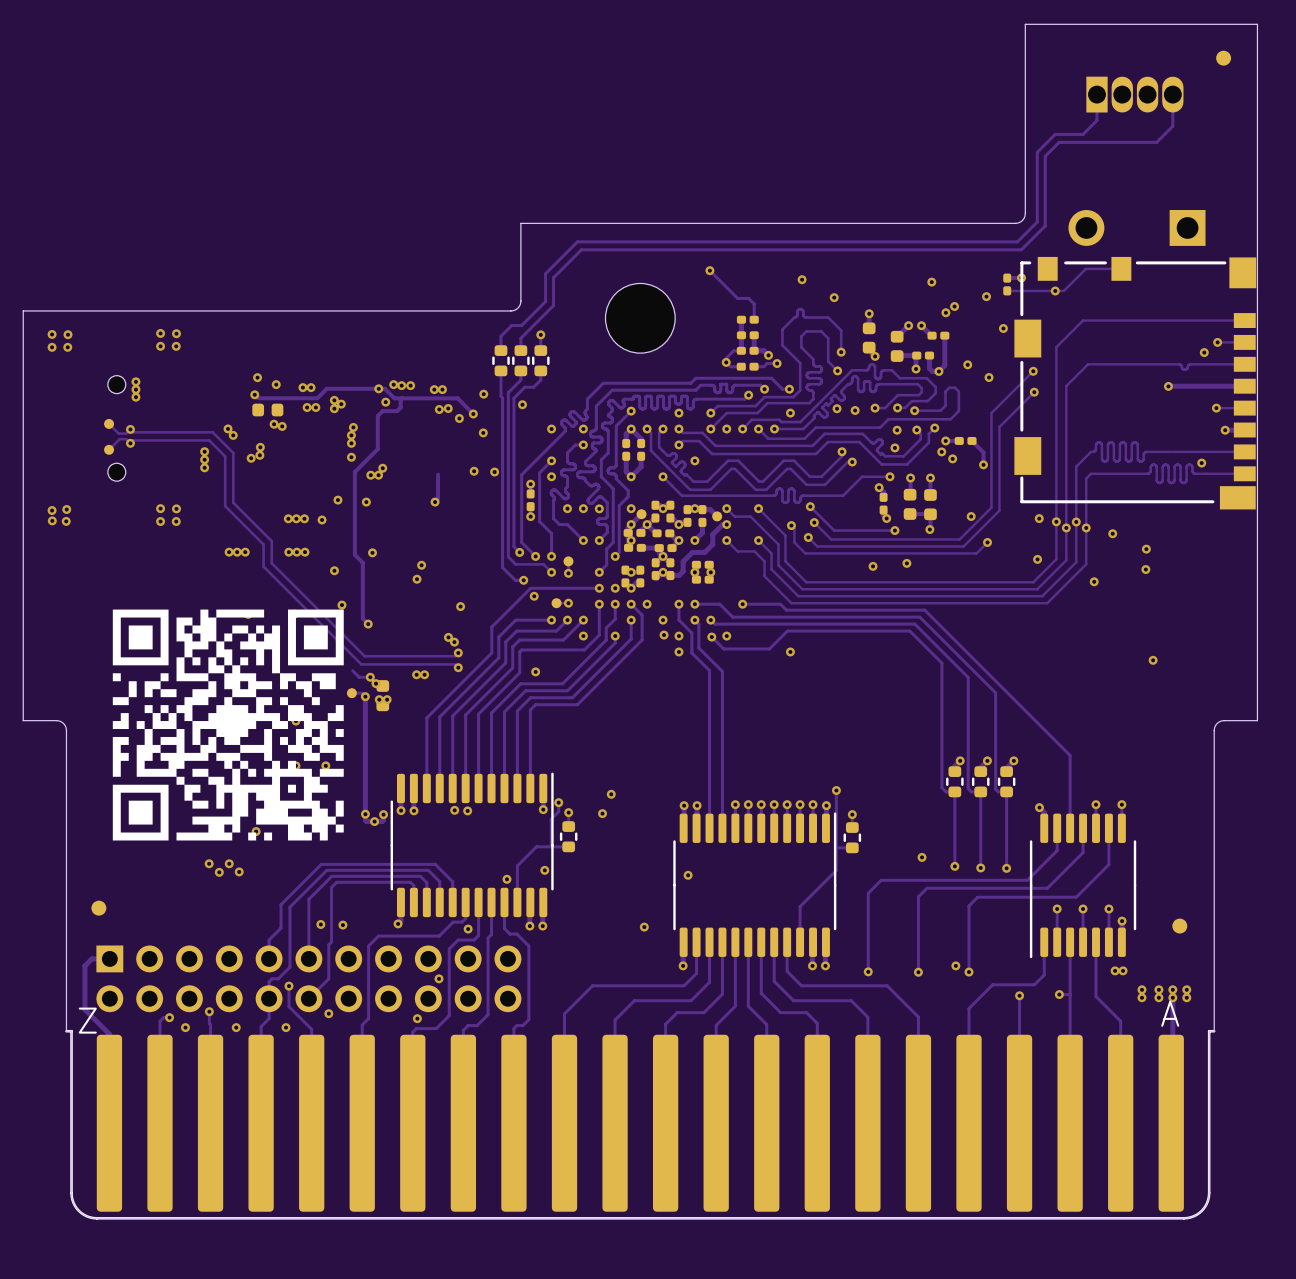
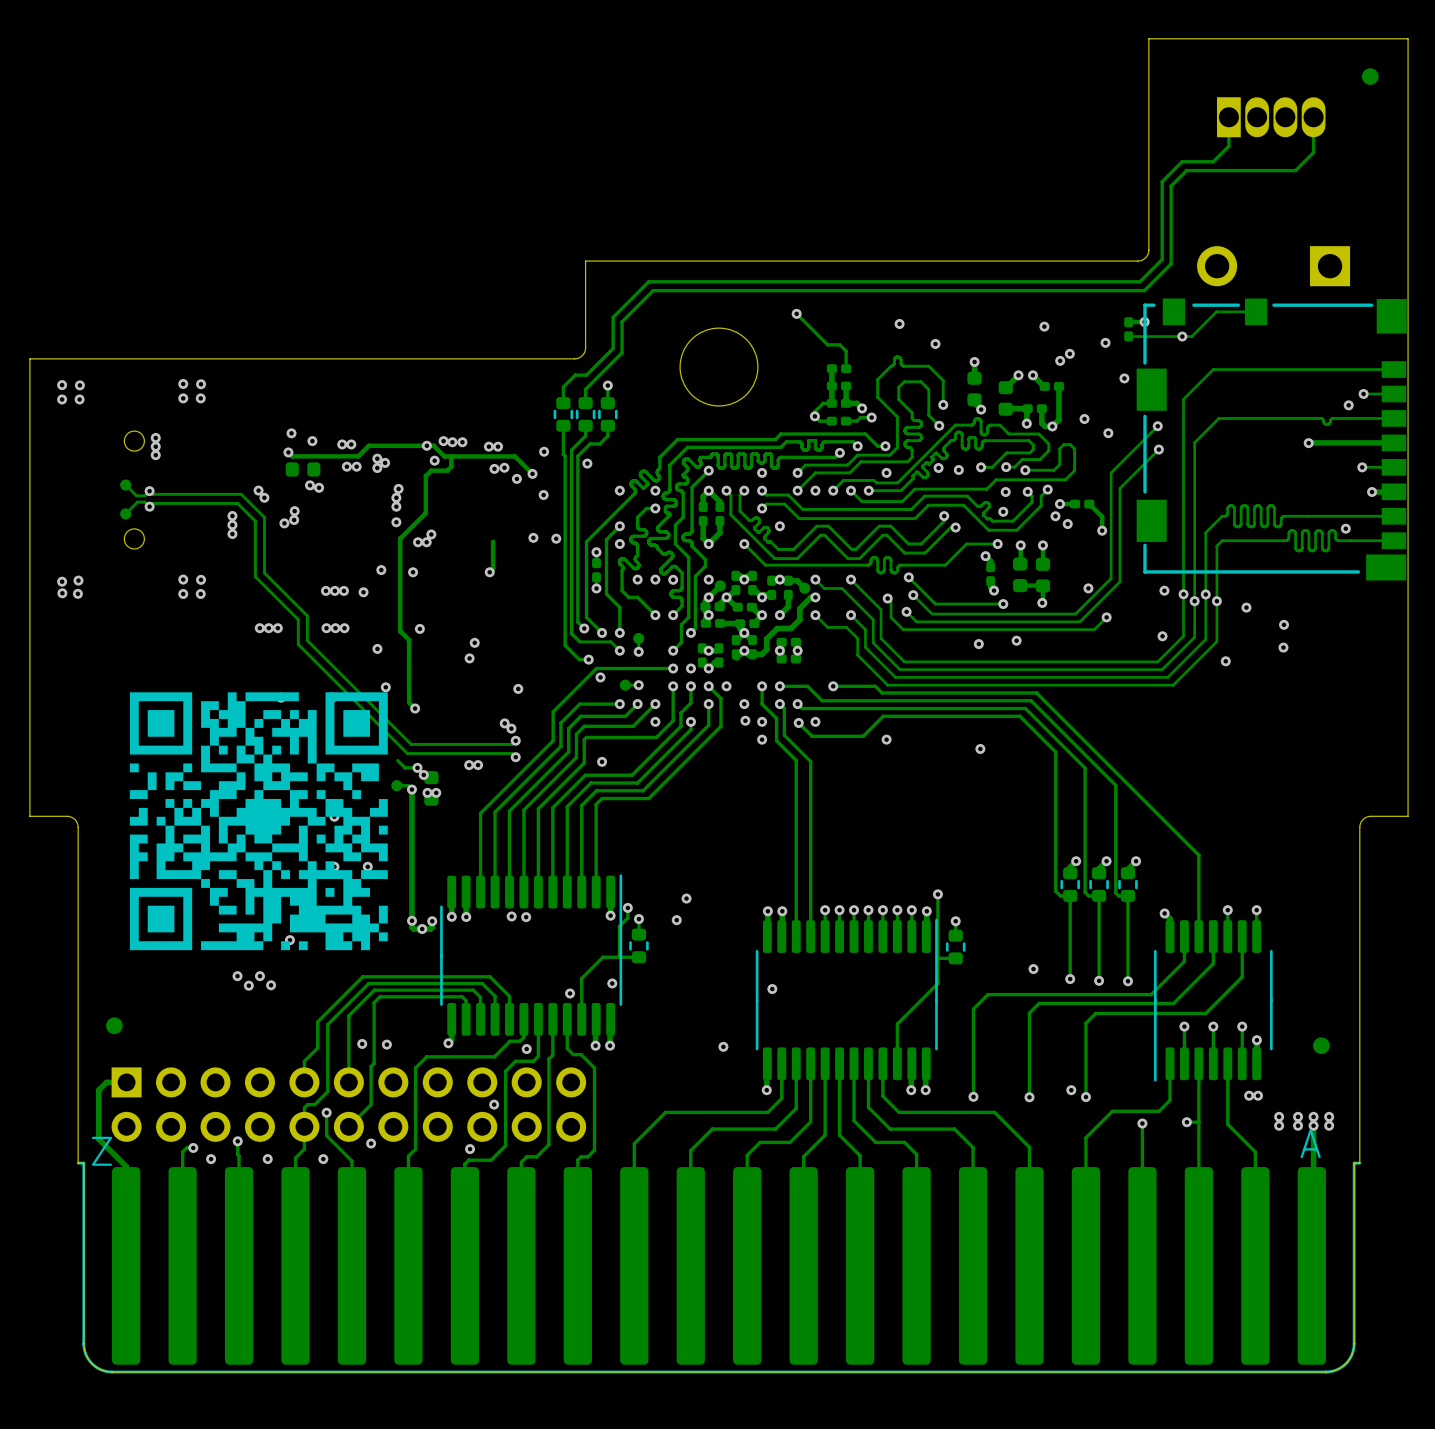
via: none -> (980, 748)
via: (1153, 660) -> none

